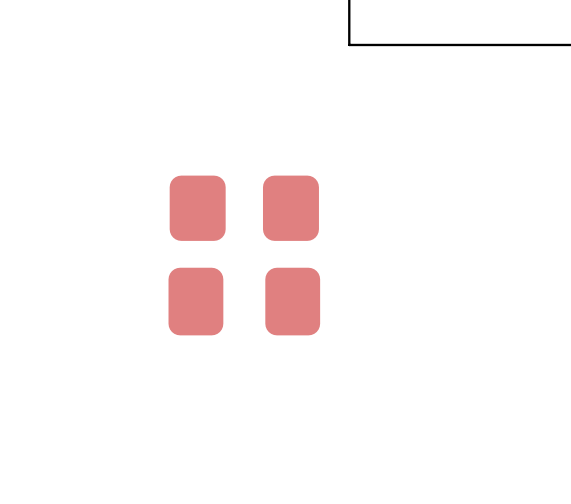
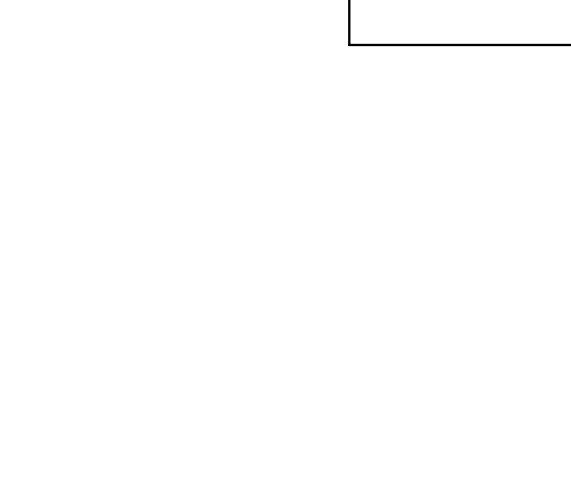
part: (244, 208) -> none
part: (244, 301) -> none

